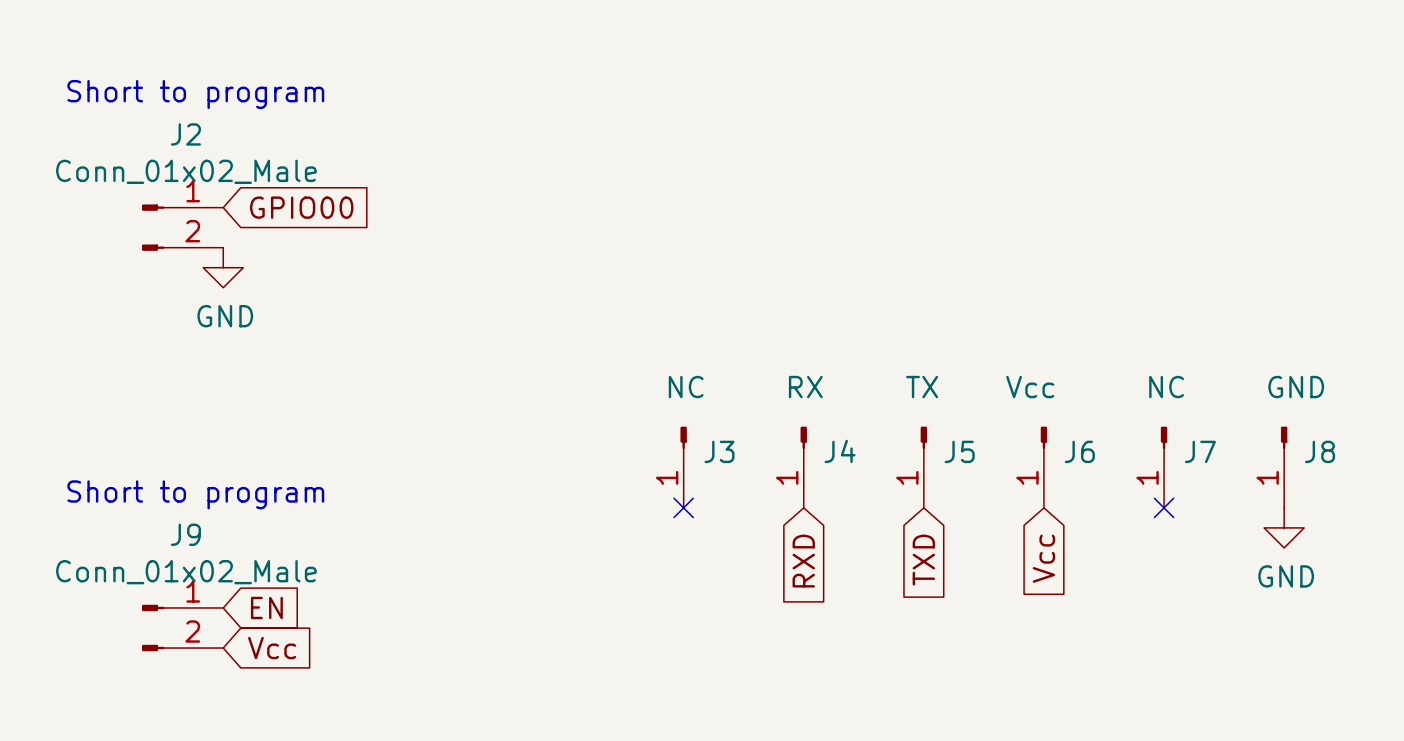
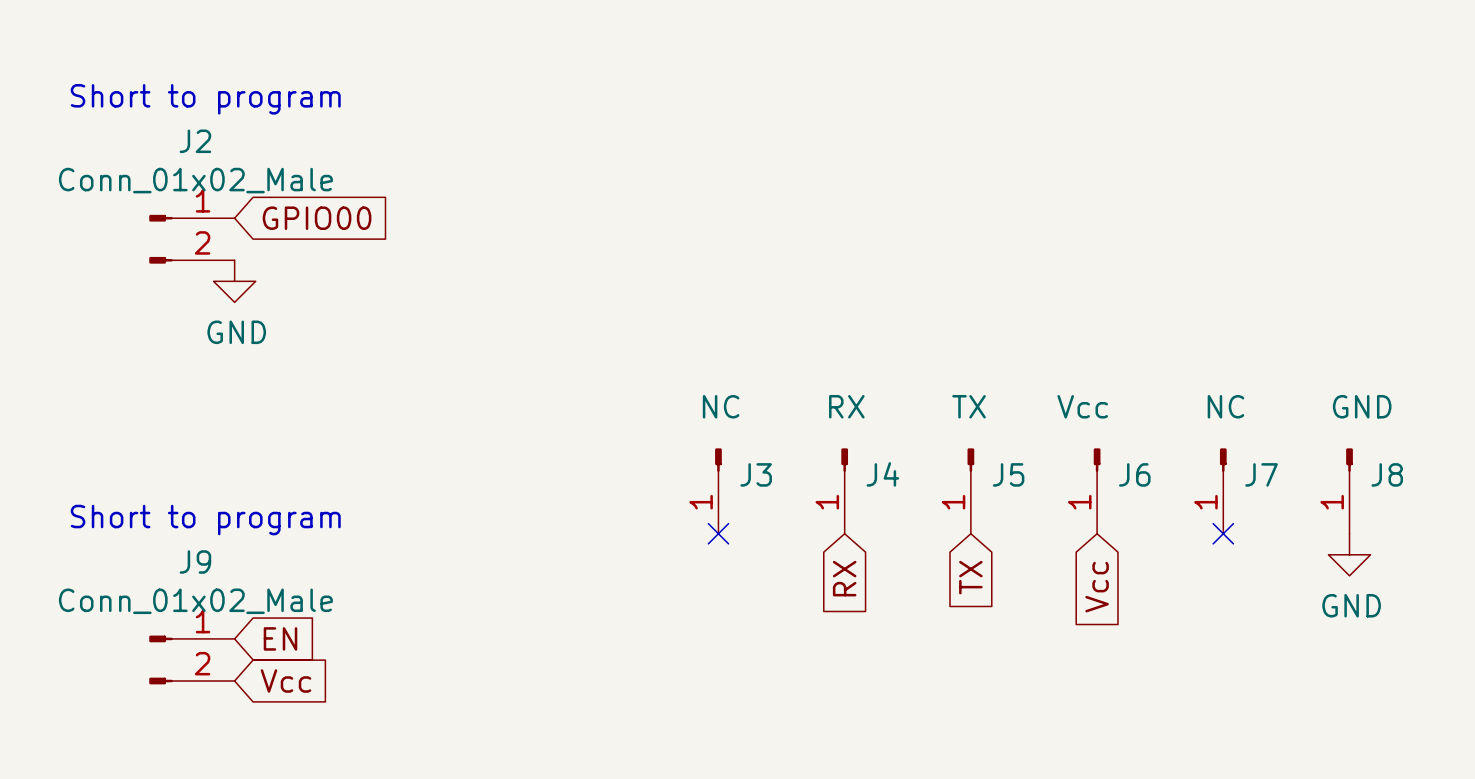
global label: TXD (923, 560) -> TX (970, 577)
global label: RXD (803, 561) -> RX (844, 578)

